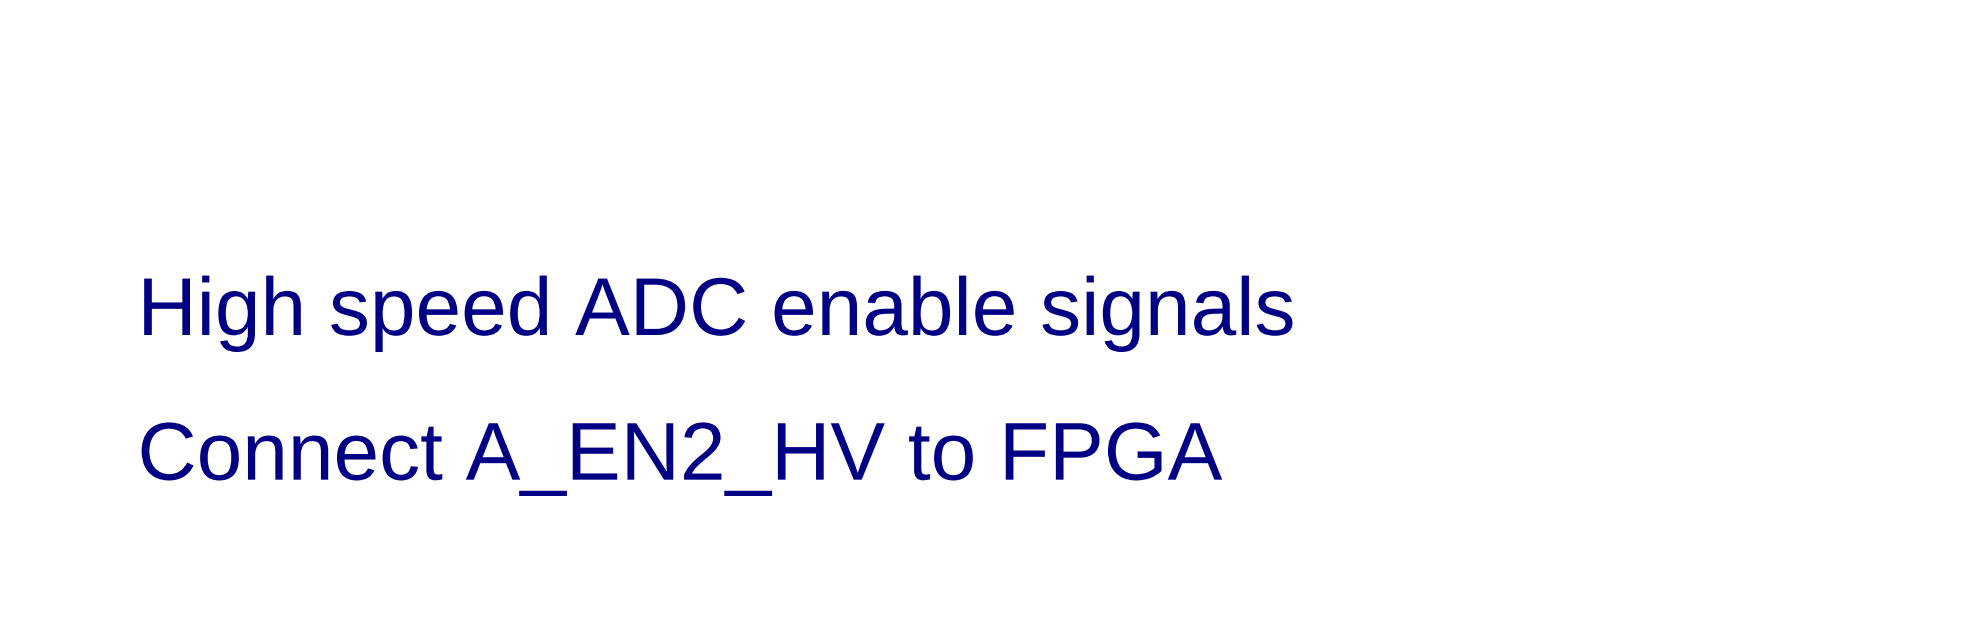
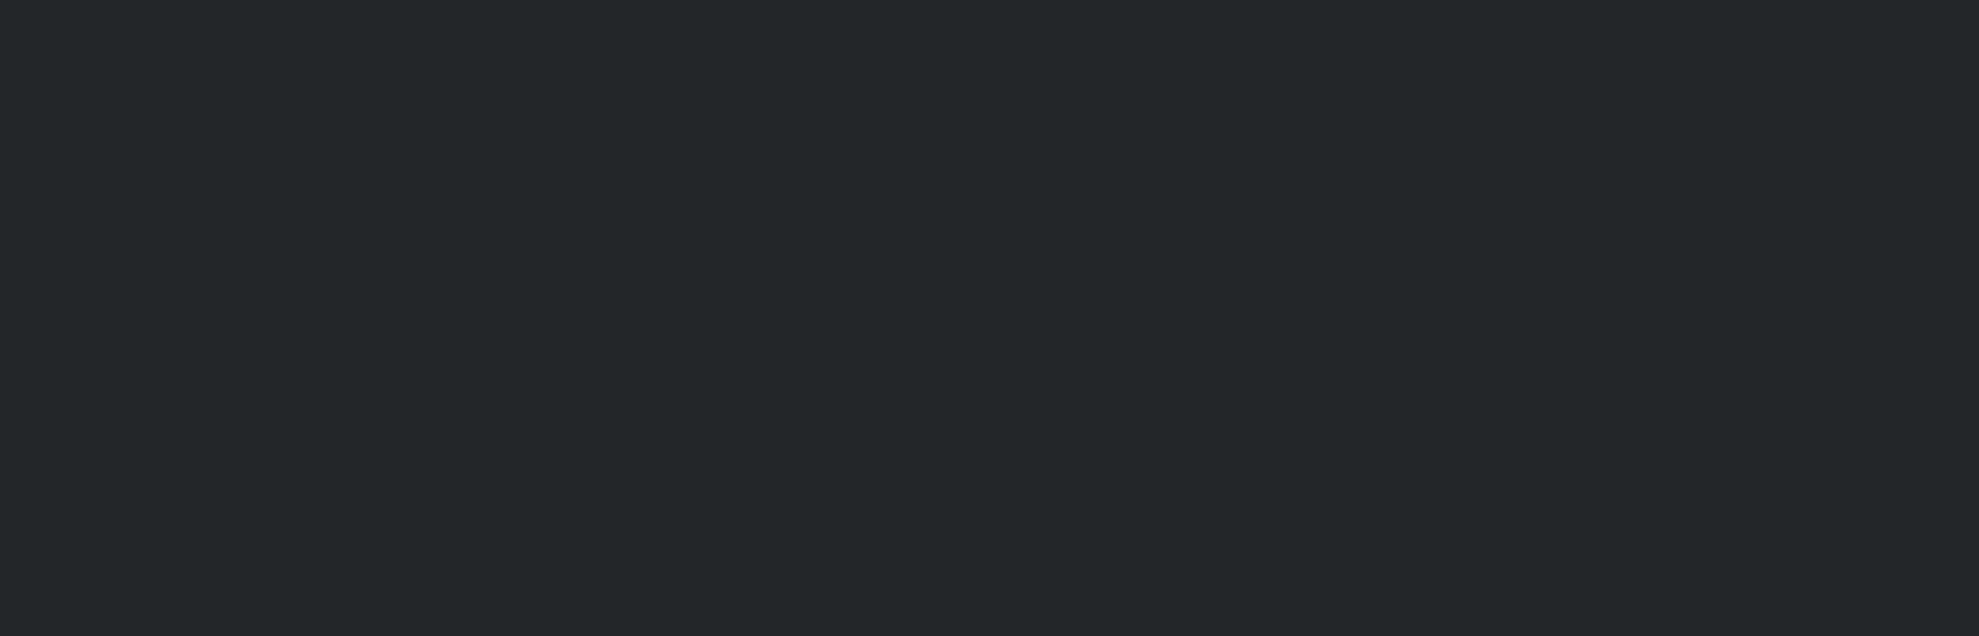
text: High speed ADC enable signals (718, 313) -> none
text: Connect A_EN2_HV to FPGA (681, 459) -> none

